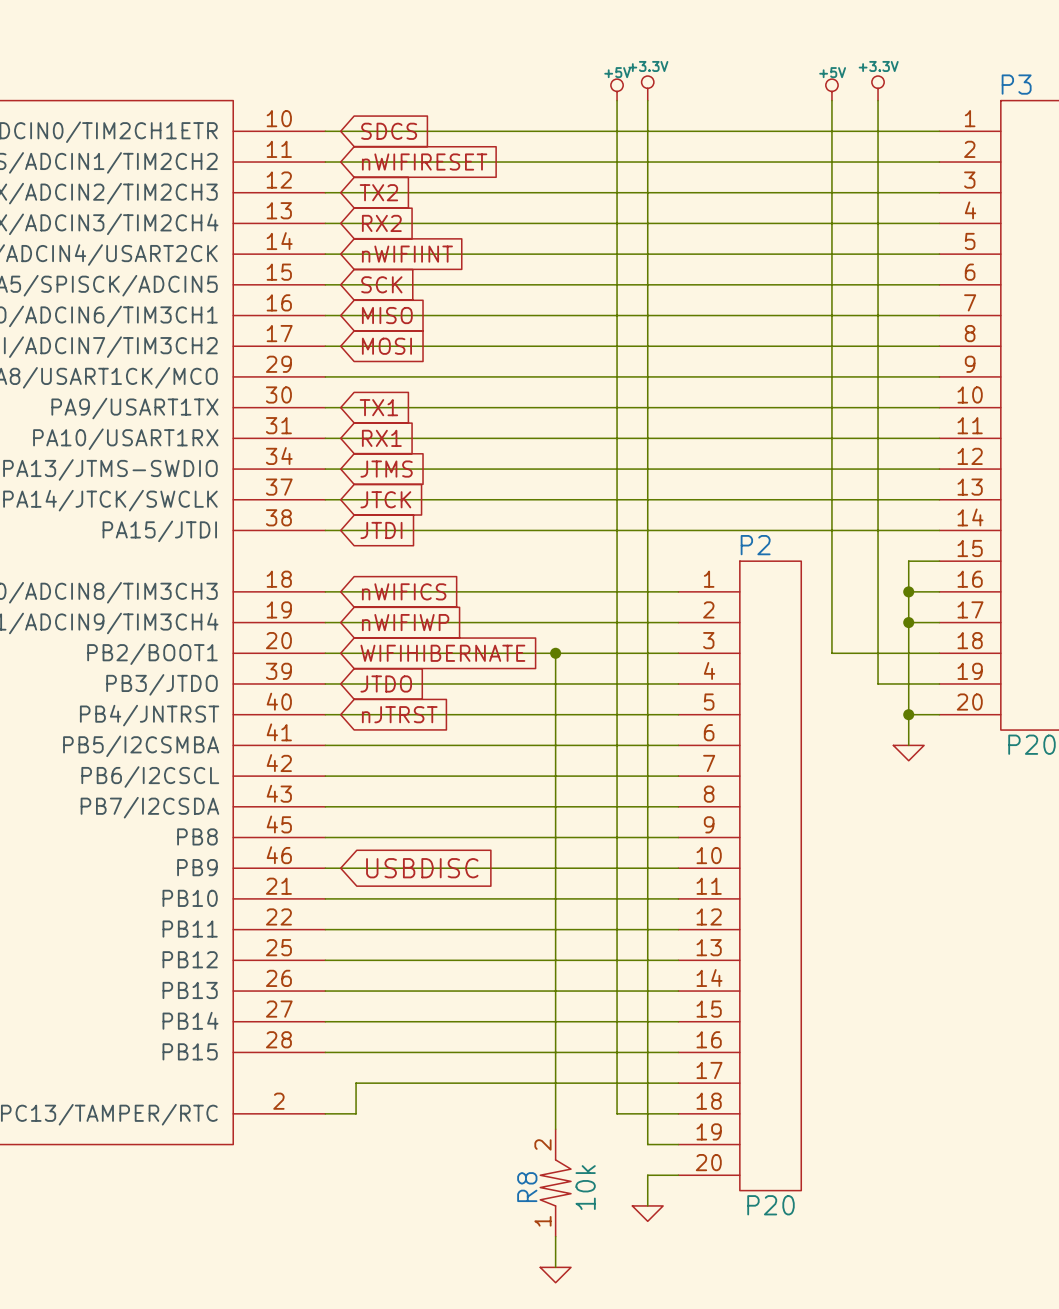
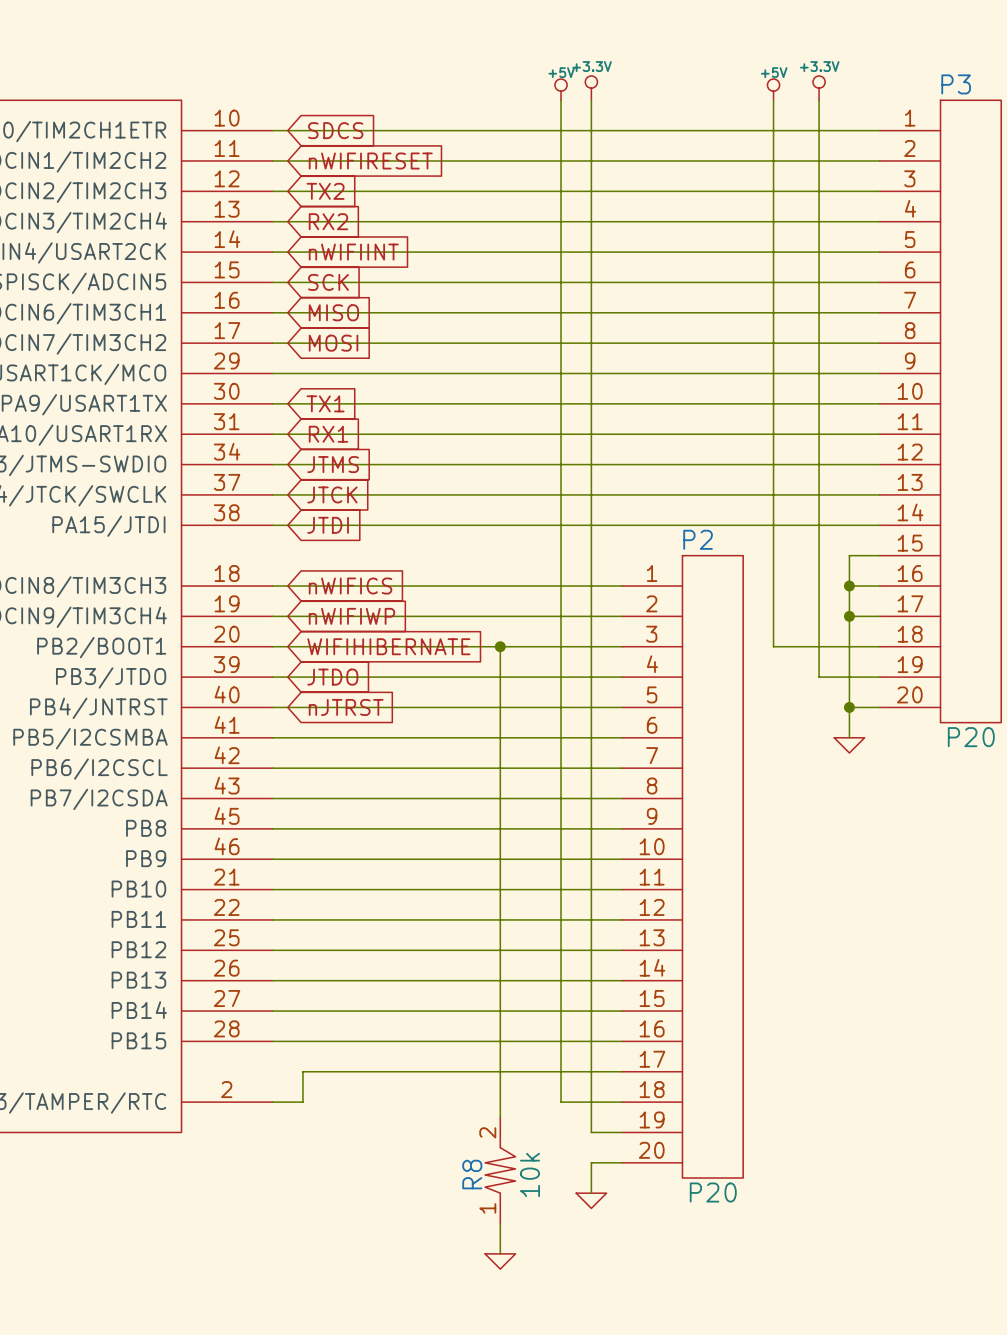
global label: USBDISC (422, 868) -> none

